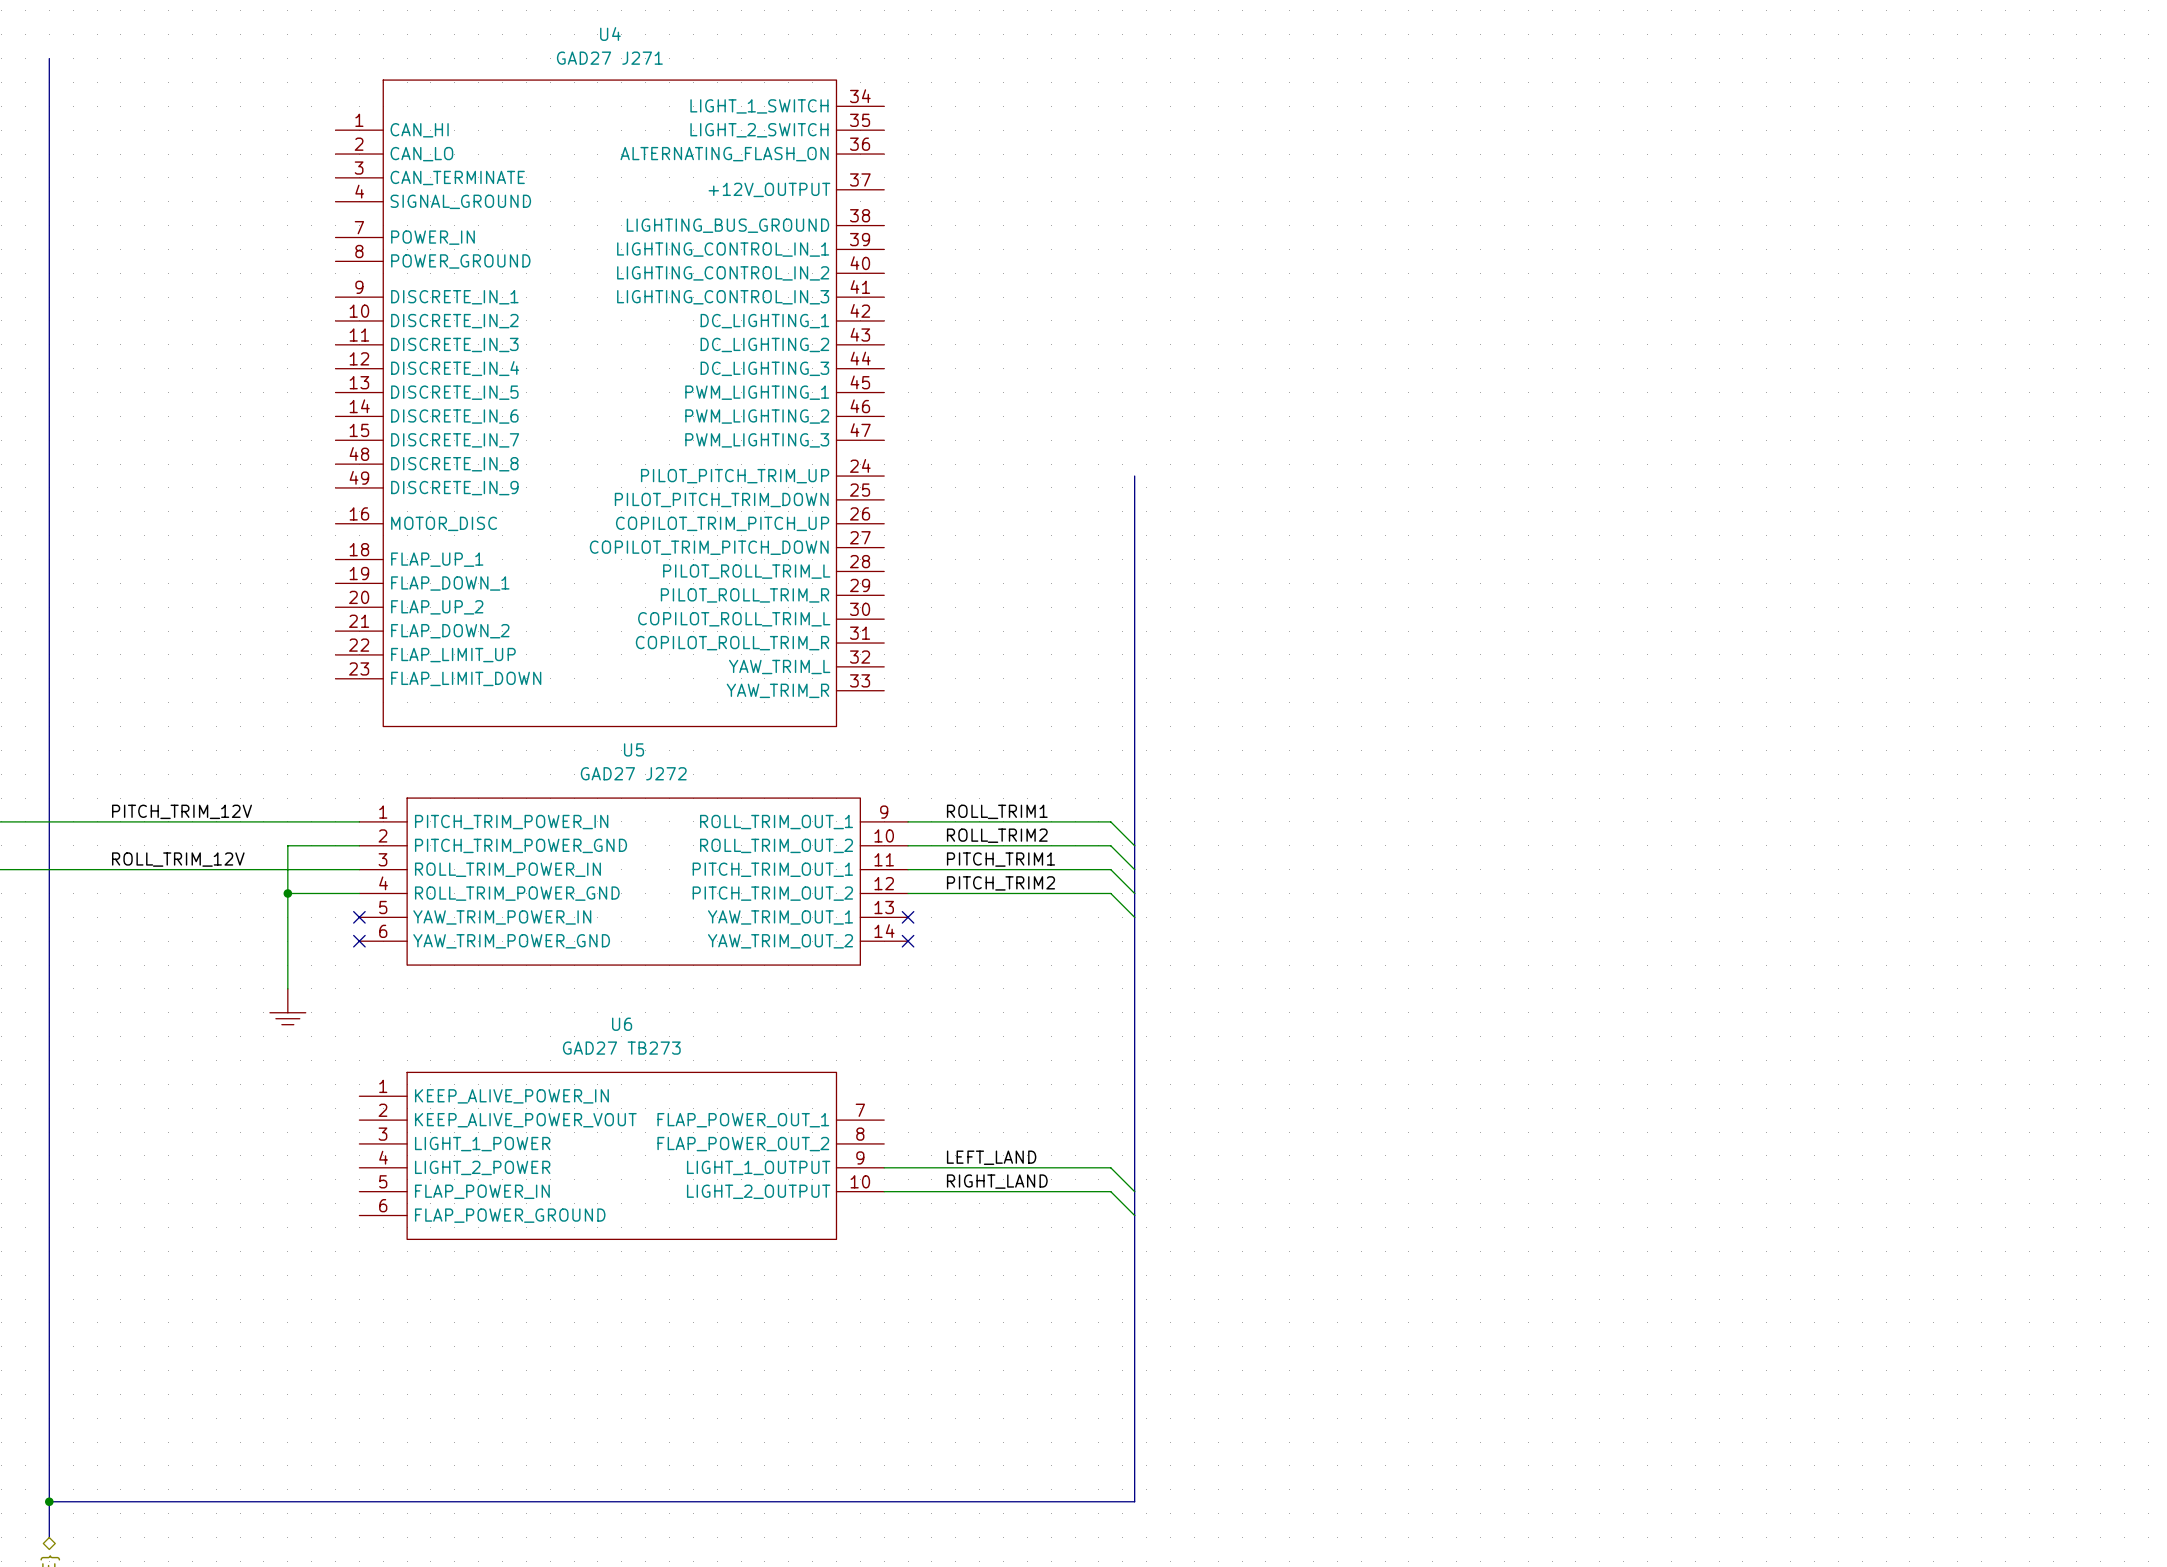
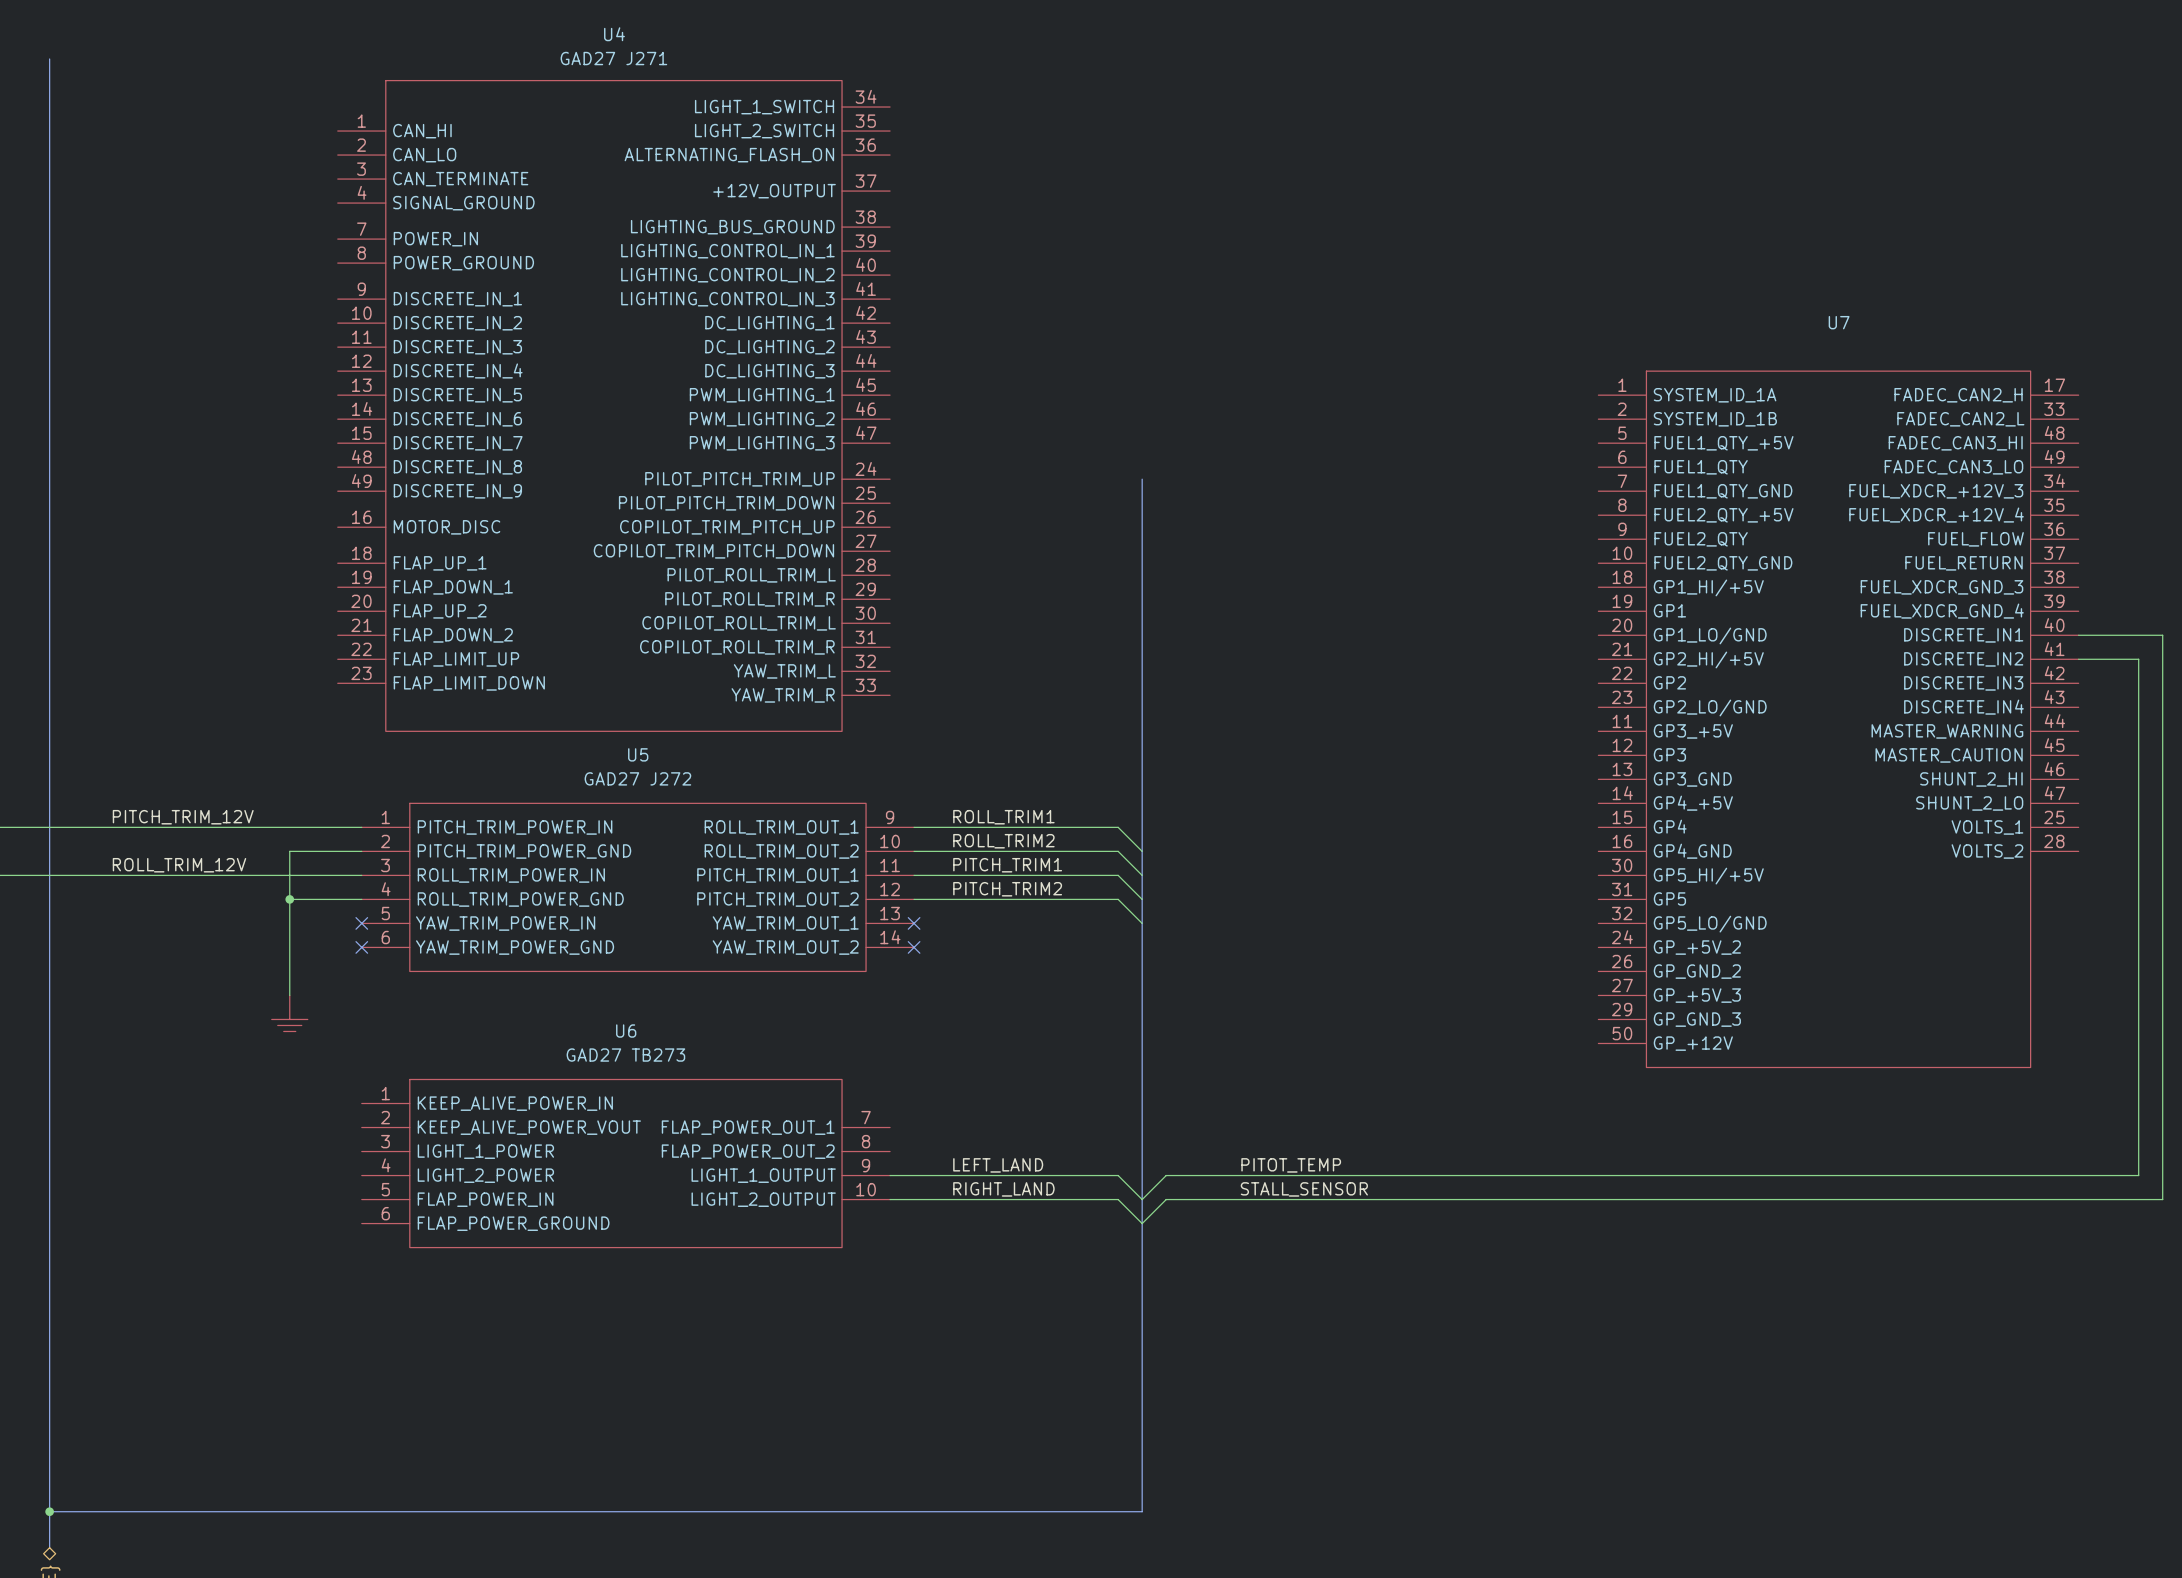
wire: none -> (2078, 635) (2162, 635) (2162, 1199) (1166, 1199) (1142, 1223)
wire: none -> (2078, 659) (2138, 659) (2138, 1175) (1166, 1175) (1142, 1199)
U7: none -> (1838, 719)
label: none -> PITOT_TEMP (1291, 1165)
label: none -> STALL_SENSOR (1304, 1189)

